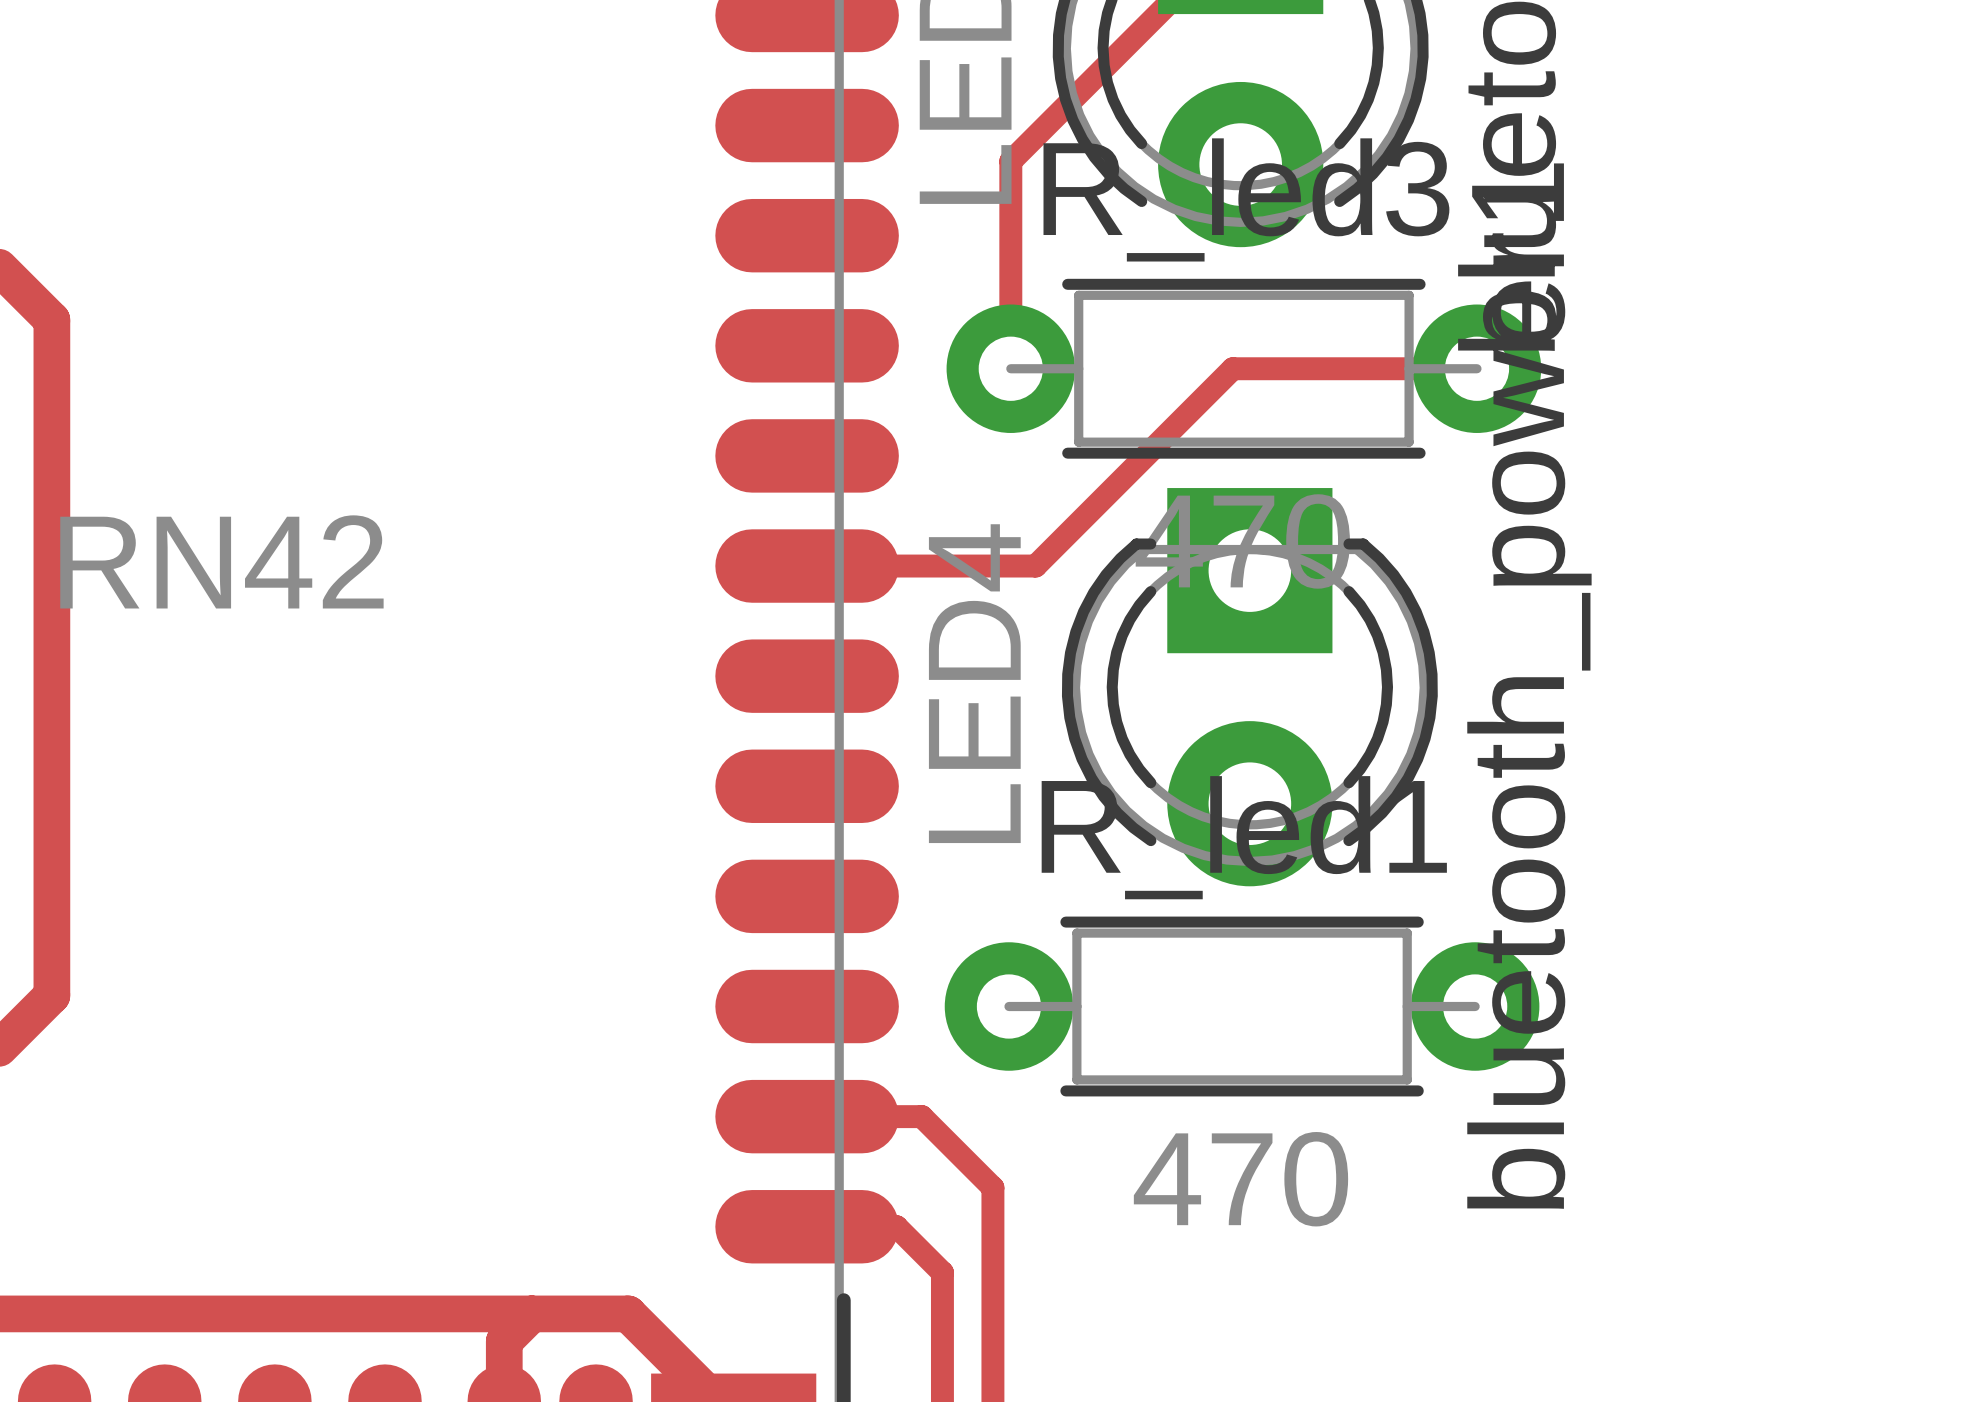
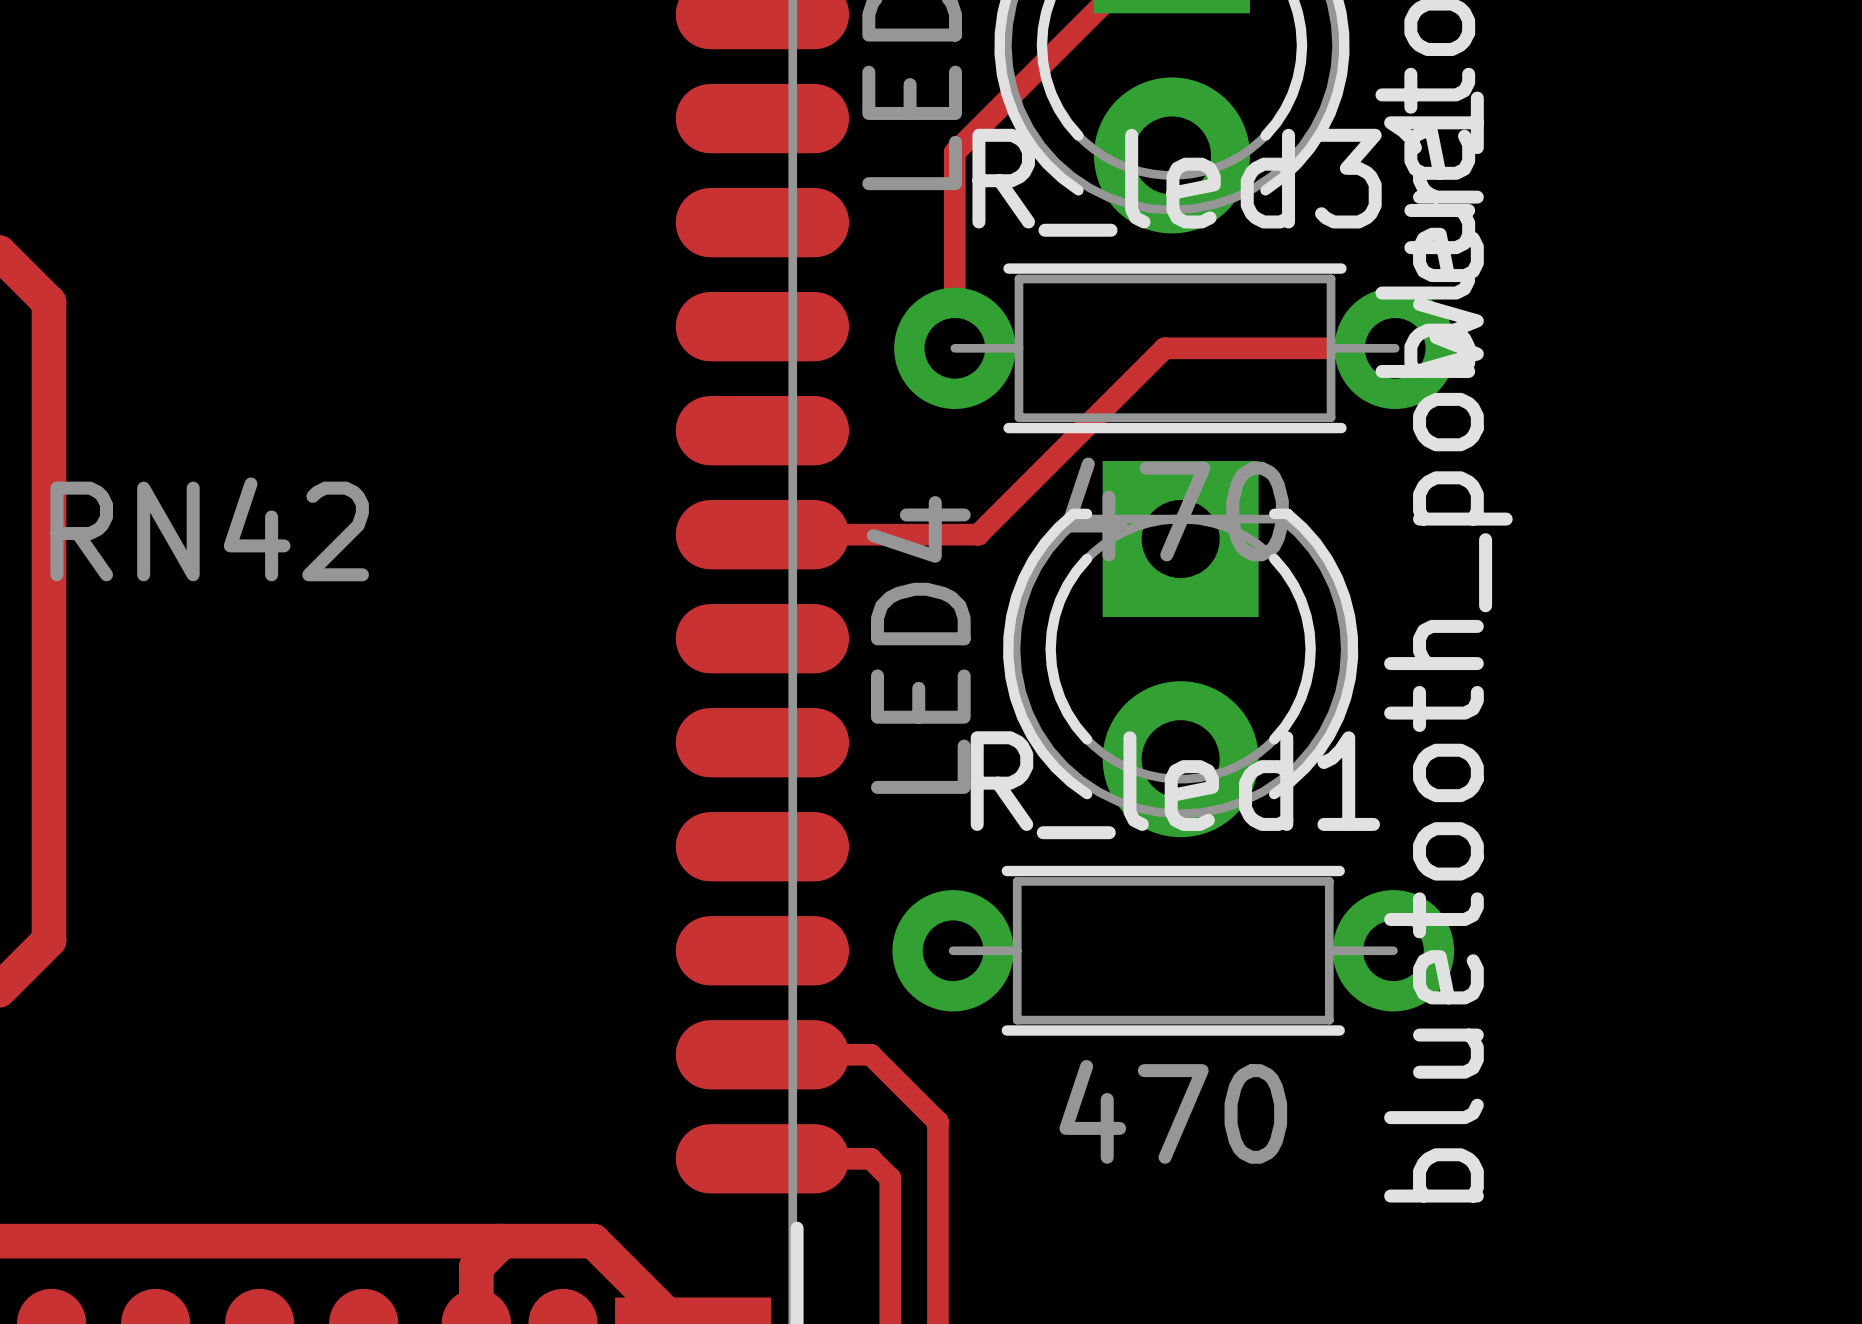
track: (896, 1226) (942, 1272) -> (846, 1158) (870, 1158) (890, 1178) (890, 1202)

